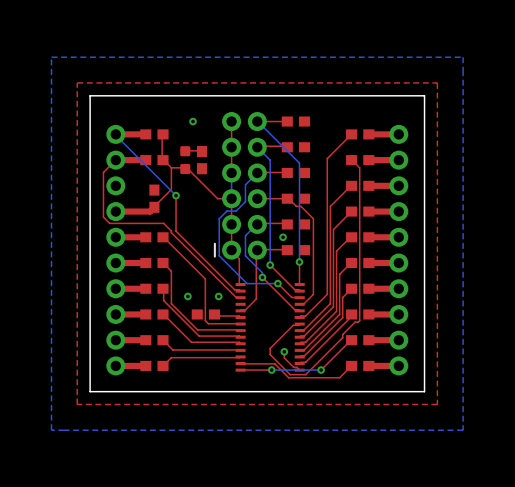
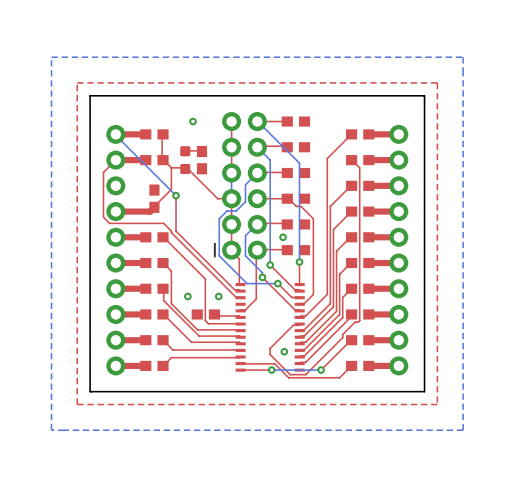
top track: (284, 351) (284, 357) (293, 367) (299, 370) -> none

